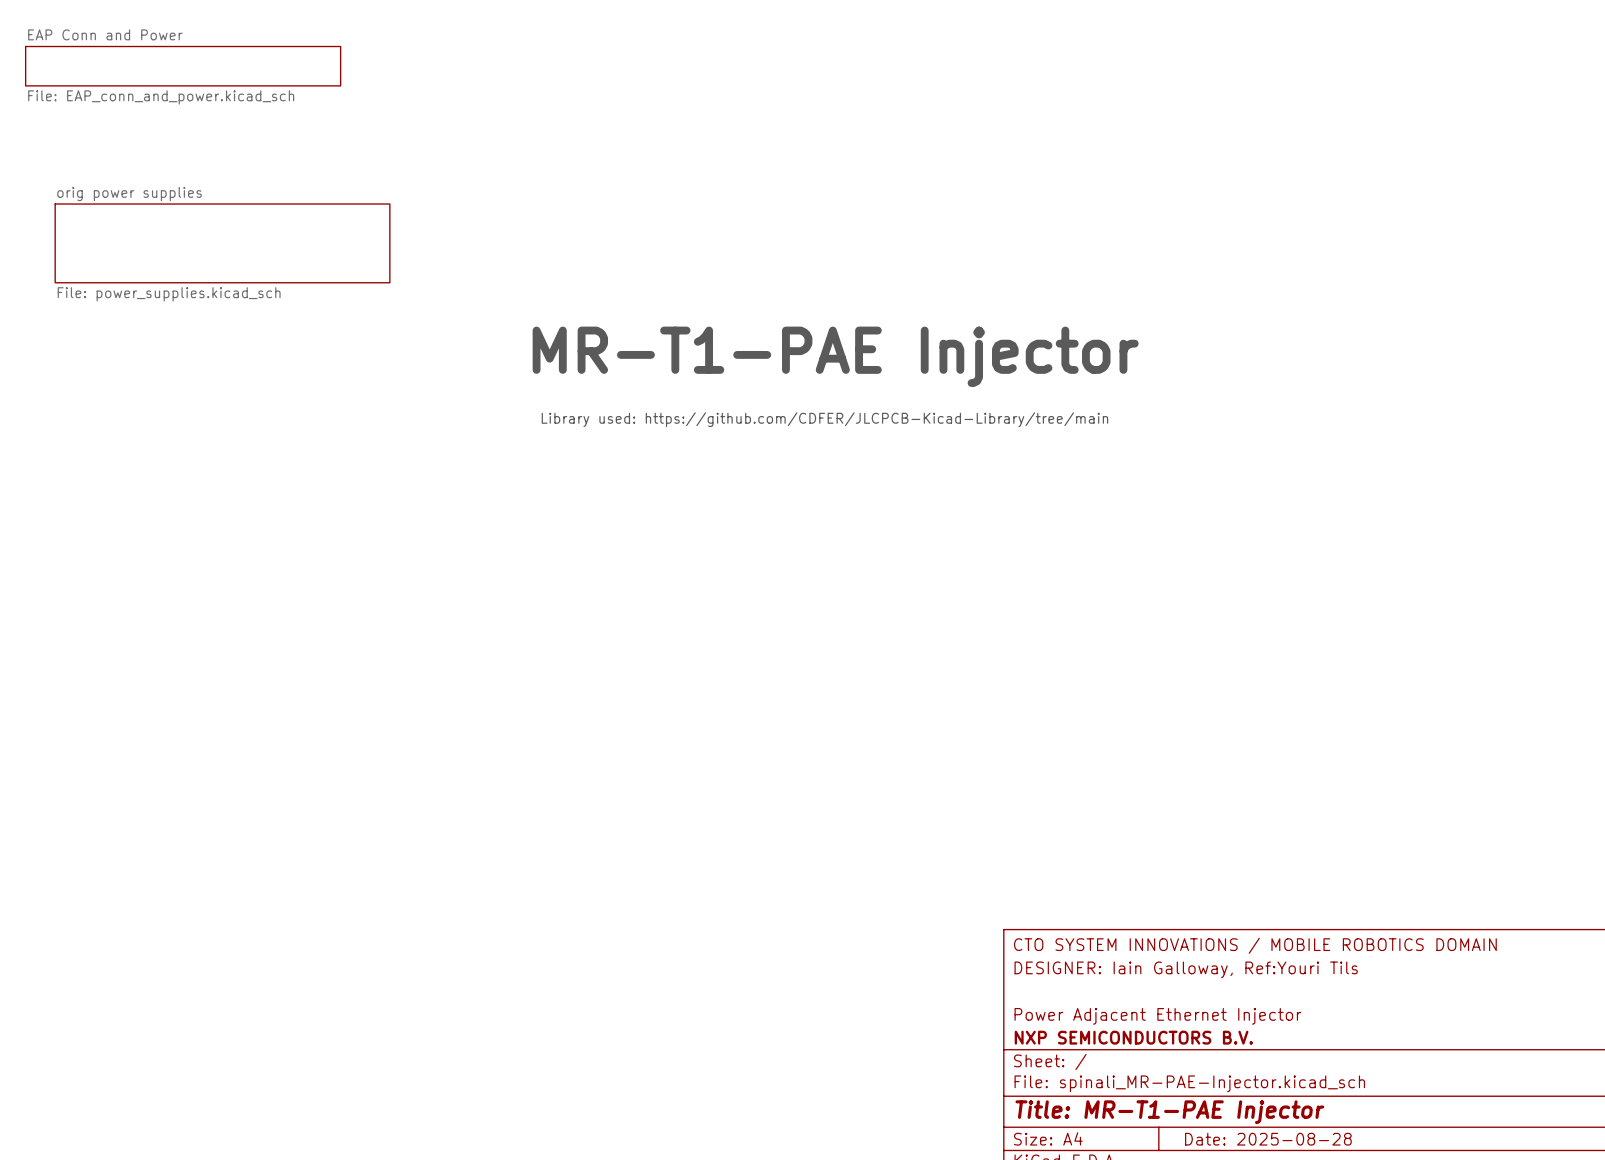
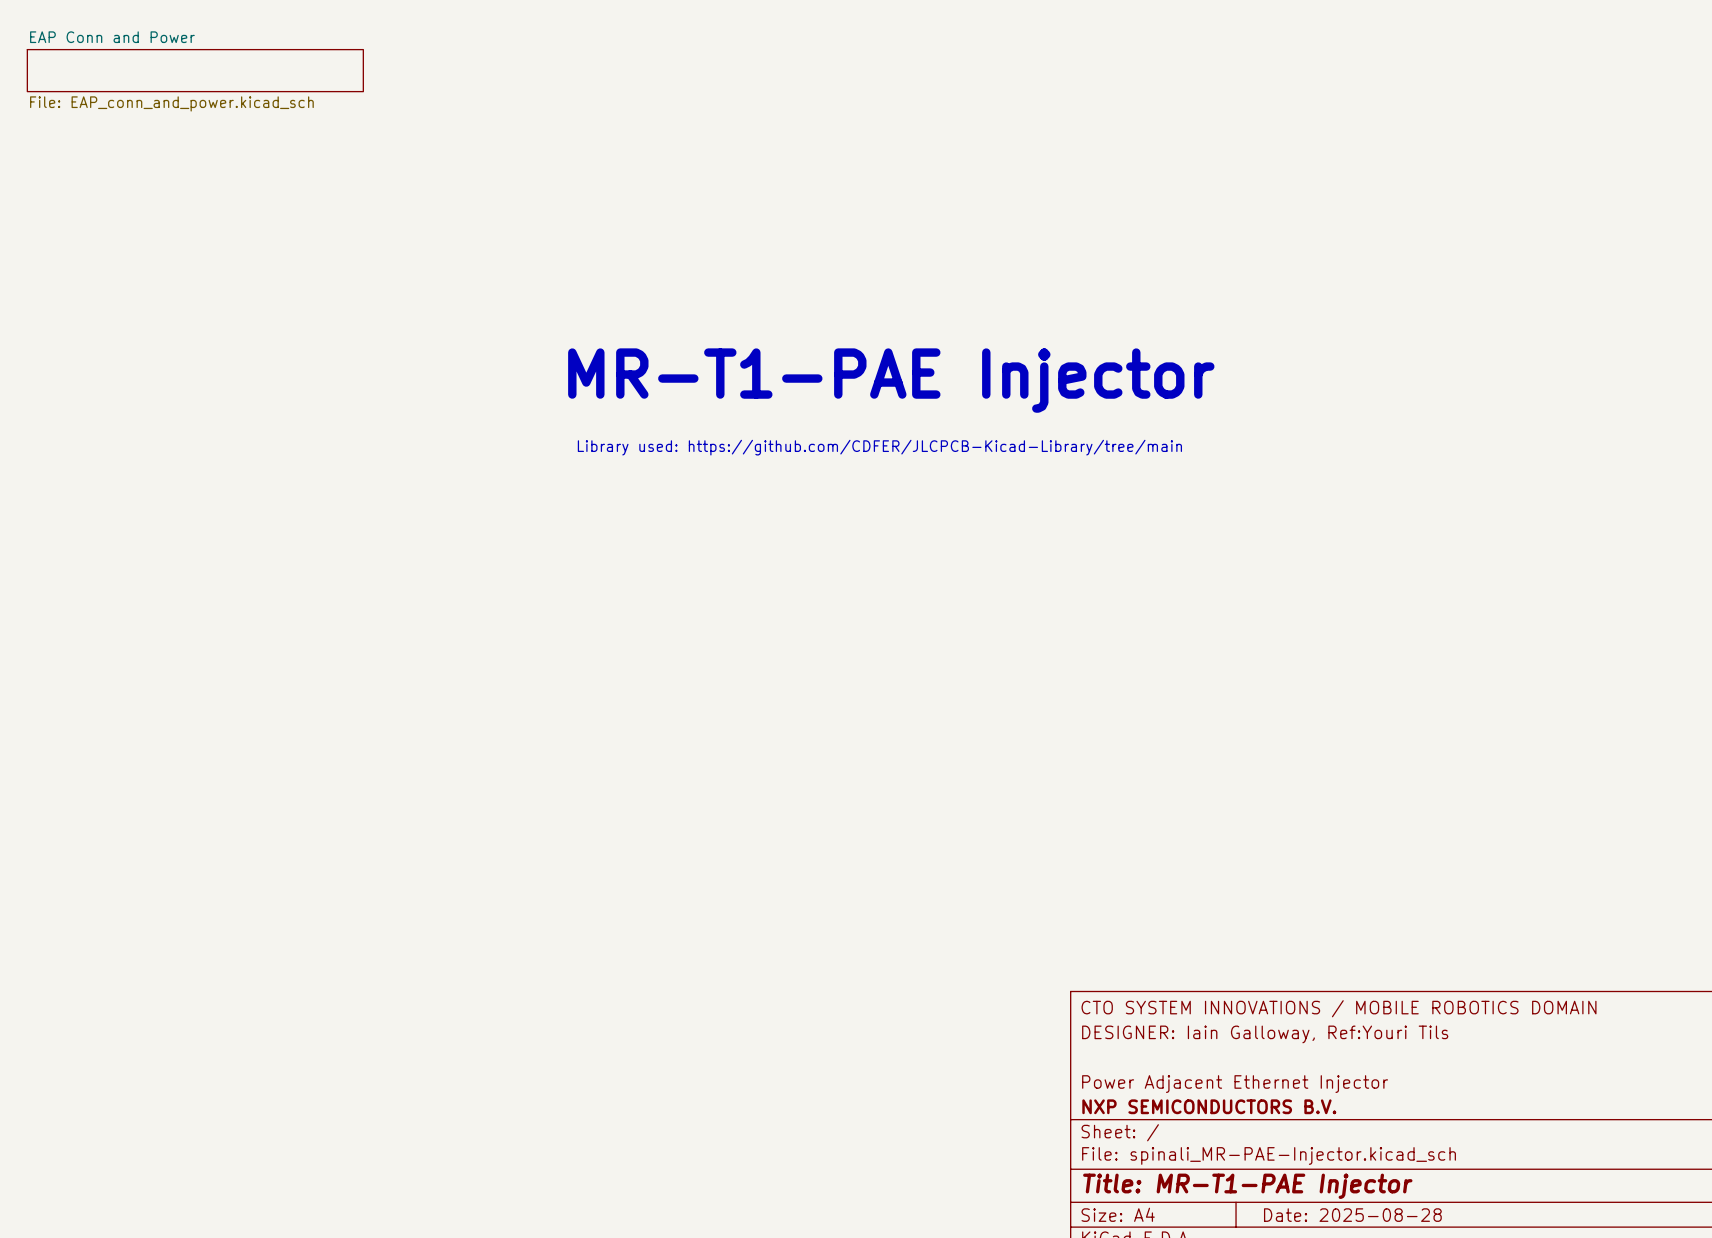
sheet orig power supplies: File: power_supplies.kicad_sch (222, 243) -> none

